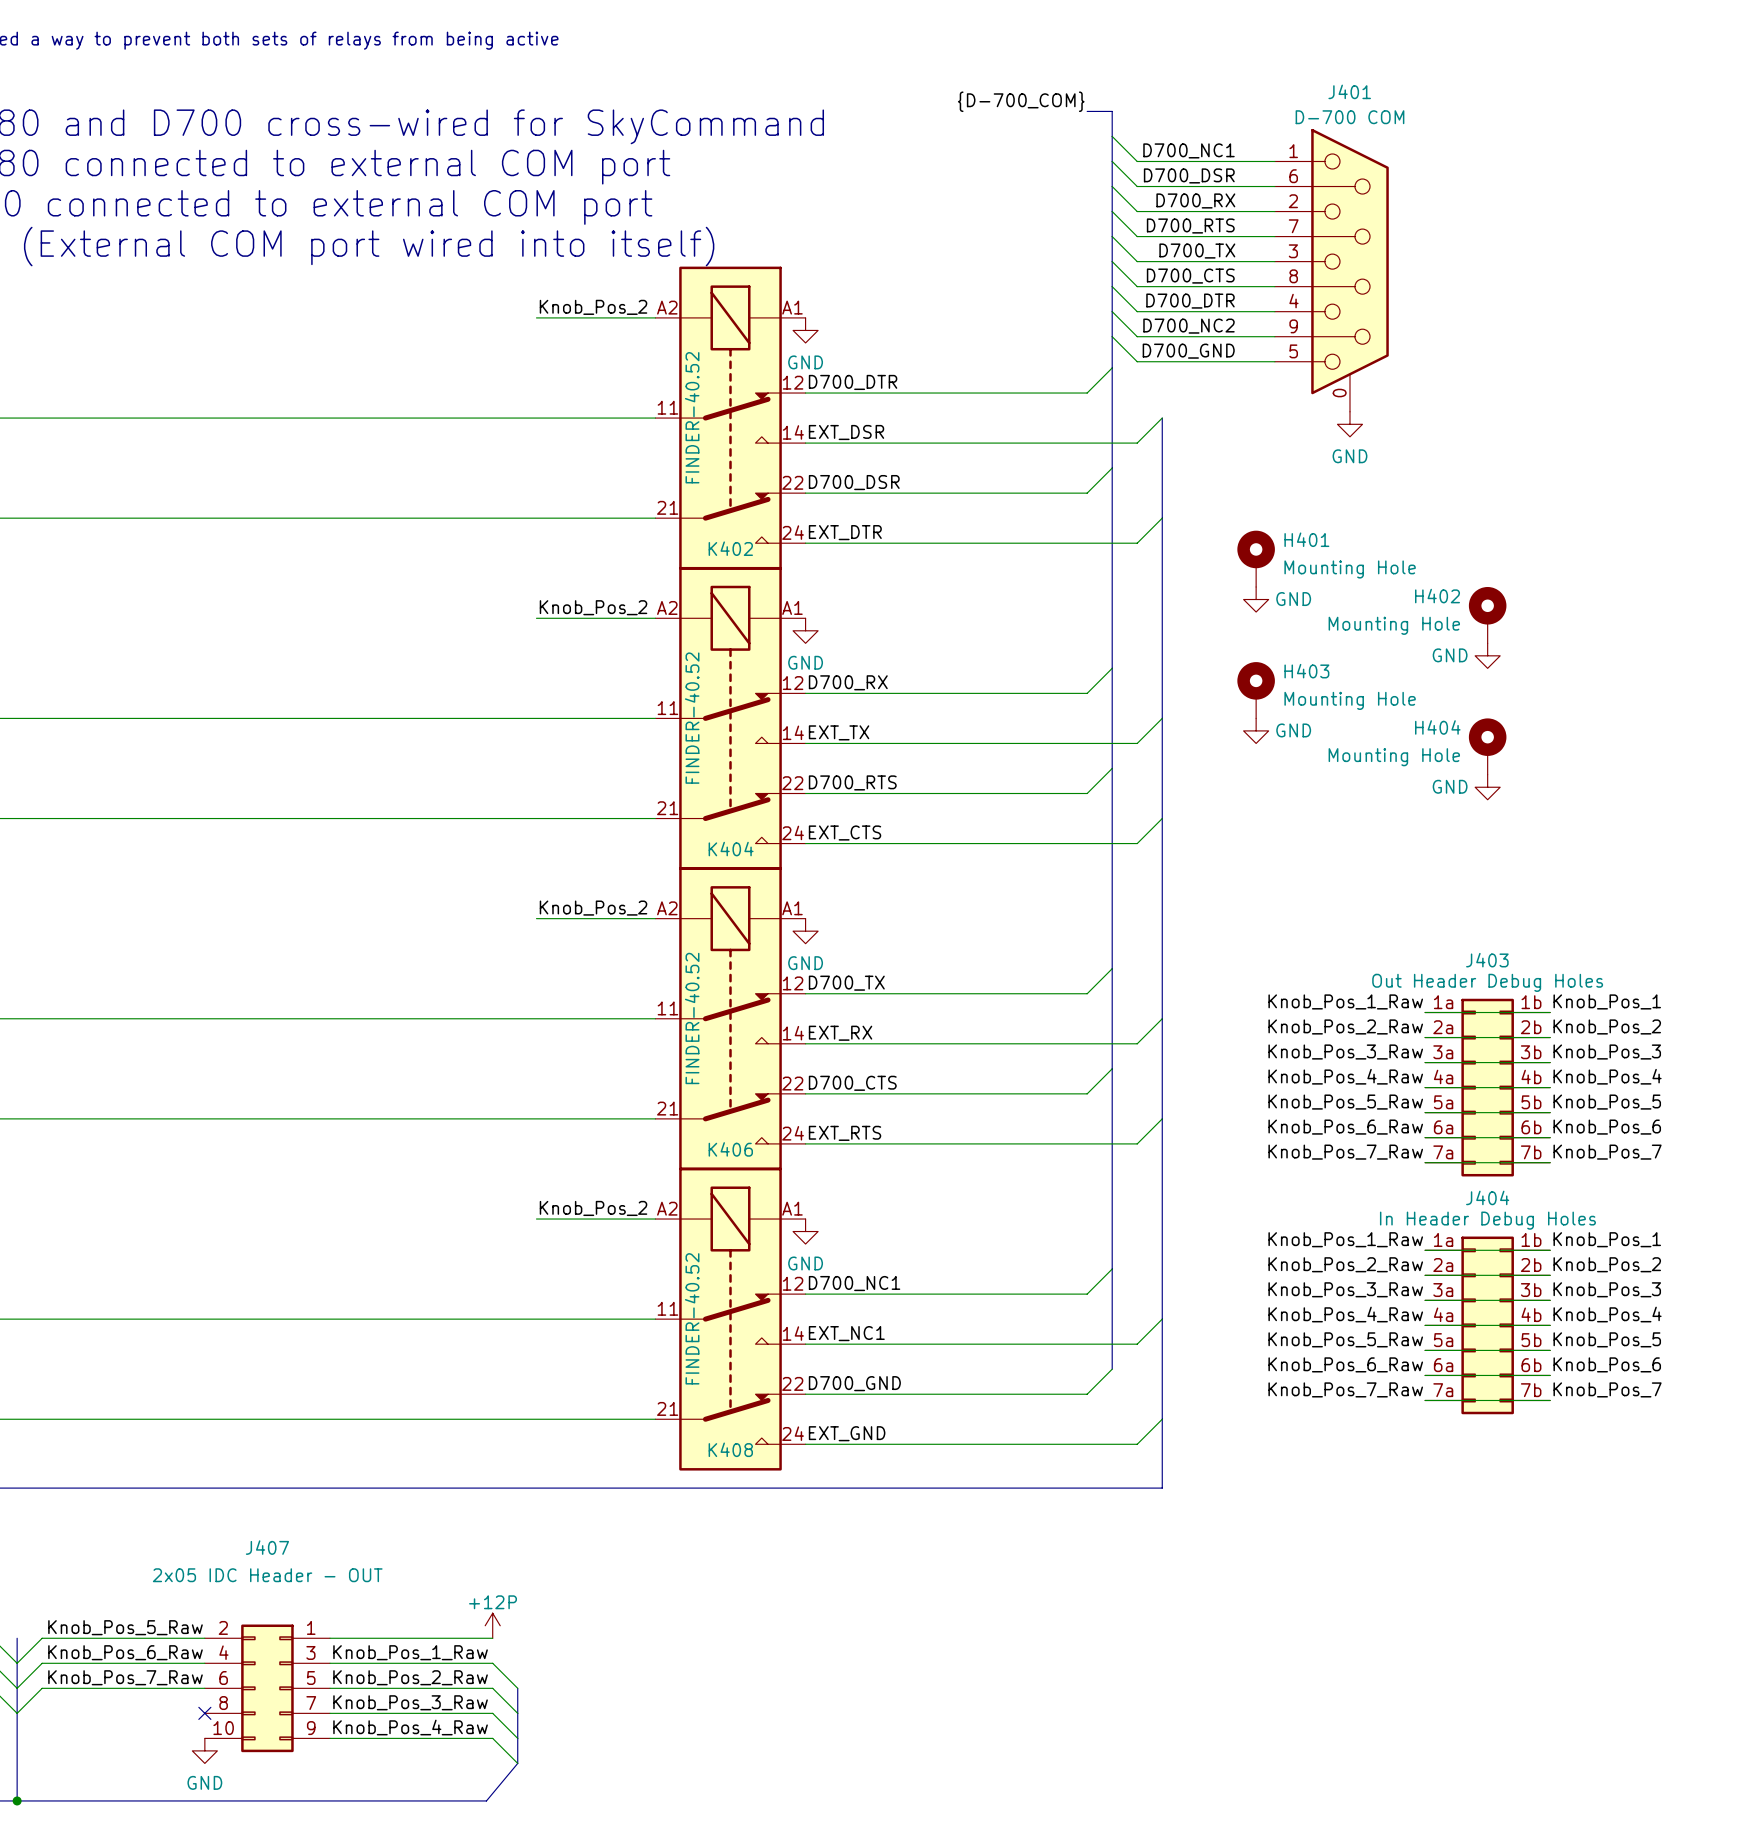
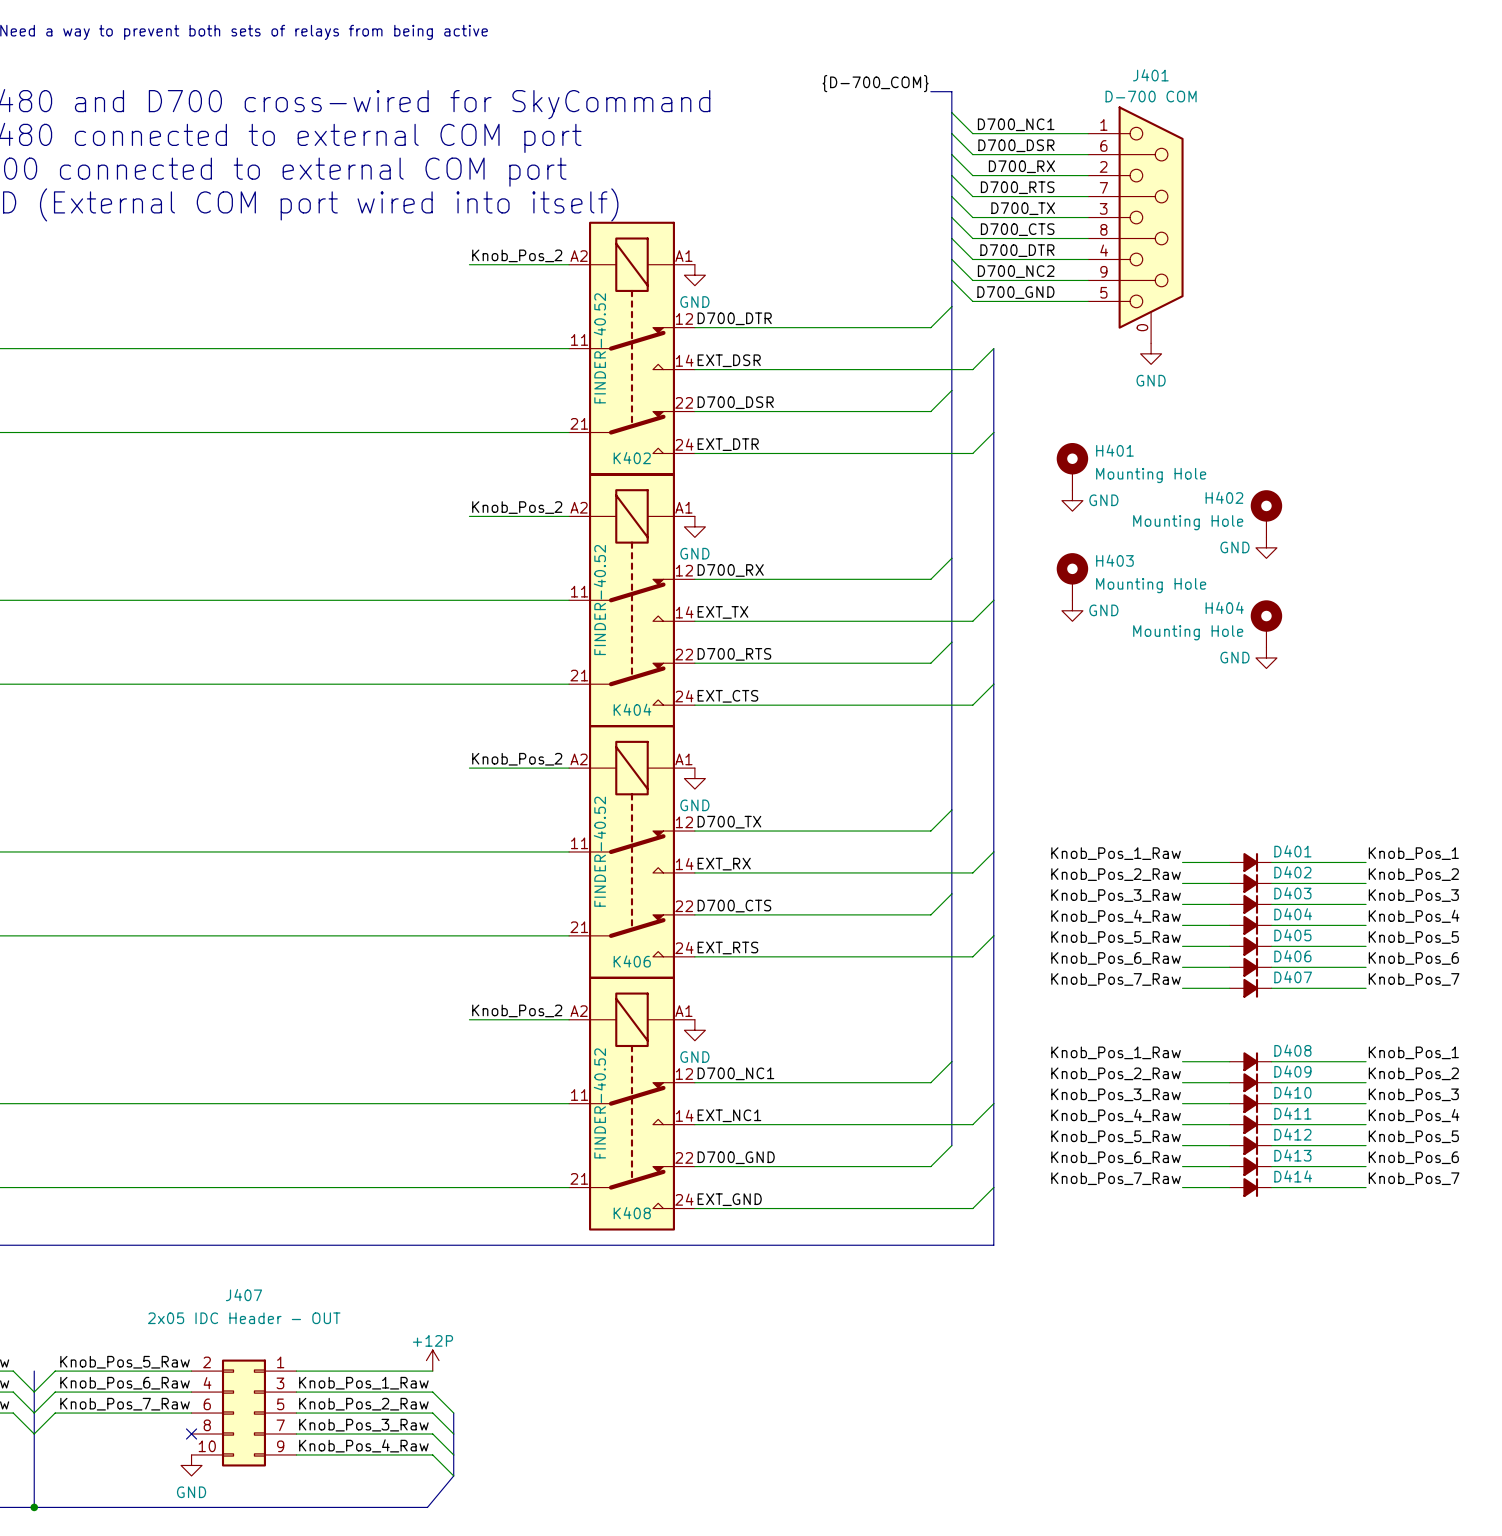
label position: Knob_Pos_1_Raw (1345, 1001) -> Knob_Pos_1_Raw (1116, 853)
label position: Knob_Pos_1 (1607, 1001) -> Knob_Pos_1 (1413, 853)
wire: (1425, 1012) (1550, 1012) -> none
label position: Knob_Pos_2_Raw (1345, 1026) -> Knob_Pos_2_Raw (1116, 874)
label position: Knob_Pos_2 (1607, 1026) -> Knob_Pos_2 (1413, 874)
wire: none -> (1182, 862) (1229, 862)
D401: none -> (1250, 862)
wire: none -> (1271, 862) (1366, 862)
wire: (1425, 1037) (1550, 1037) -> none
label position: Knob_Pos_3_Raw (1345, 1052) -> Knob_Pos_3_Raw (1116, 895)
label position: Knob_Pos_3 (1607, 1052) -> Knob_Pos_3 (1413, 895)
wire: none -> (1182, 883) (1229, 883)
D402: none -> (1250, 883)
wire: none -> (1271, 883) (1366, 883)
wire: (1425, 1062) (1550, 1062) -> none
label position: Knob_Pos_4_Raw (1345, 1076) -> Knob_Pos_4_Raw (1116, 916)
label position: Knob_Pos_4 (1607, 1076) -> Knob_Pos_4 (1414, 916)
wire: none -> (1182, 904) (1229, 904)
D403: none -> (1250, 904)
wire: none -> (1271, 904) (1366, 904)
wire: (1425, 1087) (1550, 1087) -> none
J403: Out Header Debug Holes (1487, 1087) -> none
label position: Knob_Pos_5_Raw (1345, 1102) -> Knob_Pos_5_Raw (1116, 937)
label position: Knob_Pos_5 (1607, 1102) -> Knob_Pos_5 (1413, 937)
wire: none -> (1182, 925) (1229, 925)
D404: none -> (1250, 925)
wire: none -> (1271, 925) (1366, 925)
wire: (1425, 1112) (1550, 1112) -> none
label position: Knob_Pos_6_Raw (1345, 1127) -> Knob_Pos_6_Raw (1116, 958)
label position: Knob_Pos_6 (1607, 1127) -> Knob_Pos_6 (1413, 958)
wire: none -> (1182, 946) (1229, 946)
D405: none -> (1250, 946)
wire: none -> (1271, 946) (1366, 946)
wire: (1425, 1137) (1550, 1137) -> none
label position: Knob_Pos_7_Raw (1345, 1152) -> Knob_Pos_7_Raw (1116, 979)
label position: Knob_Pos_7 (1607, 1152) -> Knob_Pos_7 (1414, 979)
wire: none -> (1182, 967) (1229, 967)
D406: none -> (1250, 967)
wire: none -> (1271, 967) (1366, 967)
wire: (1425, 1162) (1550, 1162) -> none
wire: none -> (1182, 988) (1229, 988)
D407: none -> (1250, 988)
wire: none -> (1271, 988) (1366, 988)
label position: Knob_Pos_1_Raw (1345, 1239) -> Knob_Pos_1_Raw (1116, 1052)
label position: Knob_Pos_1 (1607, 1239) -> Knob_Pos_1 (1413, 1052)
wire: (1425, 1250) (1550, 1250) -> none
label position: Knob_Pos_2_Raw (1345, 1264) -> Knob_Pos_2_Raw (1116, 1073)
label position: Knob_Pos_2 (1607, 1264) -> Knob_Pos_2 (1413, 1073)
wire: none -> (1182, 1061) (1229, 1061)
D408: none -> (1250, 1061)
wire: none -> (1271, 1061) (1366, 1061)
wire: (1425, 1275) (1550, 1275) -> none
label position: Knob_Pos_3_Raw (1345, 1289) -> Knob_Pos_3_Raw (1116, 1094)
label position: Knob_Pos_3 (1607, 1289) -> Knob_Pos_3 (1413, 1094)
wire: none -> (1182, 1082) (1229, 1082)
D409: none -> (1250, 1082)
wire: none -> (1271, 1082) (1366, 1082)
wire: (1425, 1300) (1550, 1300) -> none
label position: Knob_Pos_4_Raw (1345, 1314) -> Knob_Pos_4_Raw (1116, 1115)
label position: Knob_Pos_4 (1607, 1314) -> Knob_Pos_4 (1414, 1115)
wire: none -> (1182, 1103) (1229, 1103)
D410: none -> (1250, 1103)
wire: none -> (1271, 1103) (1366, 1103)
wire: (1425, 1325) (1550, 1325) -> none
J404: In Header Debug Holes (1487, 1325) -> none
label position: Knob_Pos_5_Raw (1345, 1339) -> Knob_Pos_5_Raw (1116, 1136)
label position: Knob_Pos_5 (1607, 1339) -> Knob_Pos_5 (1413, 1136)
wire: none -> (1182, 1124) (1229, 1124)
D411: none -> (1250, 1124)
wire: none -> (1271, 1124) (1366, 1124)
wire: (1425, 1350) (1550, 1350) -> none
label position: Knob_Pos_6_Raw (1345, 1364) -> Knob_Pos_6_Raw (1116, 1157)
label position: Knob_Pos_6 (1607, 1364) -> Knob_Pos_6 (1413, 1157)
wire: none -> (1182, 1145) (1229, 1145)
D412: none -> (1250, 1145)
wire: none -> (1271, 1145) (1366, 1145)
wire: (1425, 1375) (1550, 1375) -> none
label position: Knob_Pos_7_Raw (1345, 1389) -> Knob_Pos_7_Raw (1116, 1178)
label position: Knob_Pos_7 (1607, 1389) -> Knob_Pos_7 (1414, 1178)
wire: none -> (1182, 1166) (1229, 1166)
D413: none -> (1250, 1166)
wire: none -> (1271, 1166) (1366, 1166)
wire: (1425, 1400) (1550, 1400) -> none
wire: none -> (1182, 1187) (1229, 1187)
D414: none -> (1250, 1187)
wire: none -> (1271, 1187) (1366, 1187)

